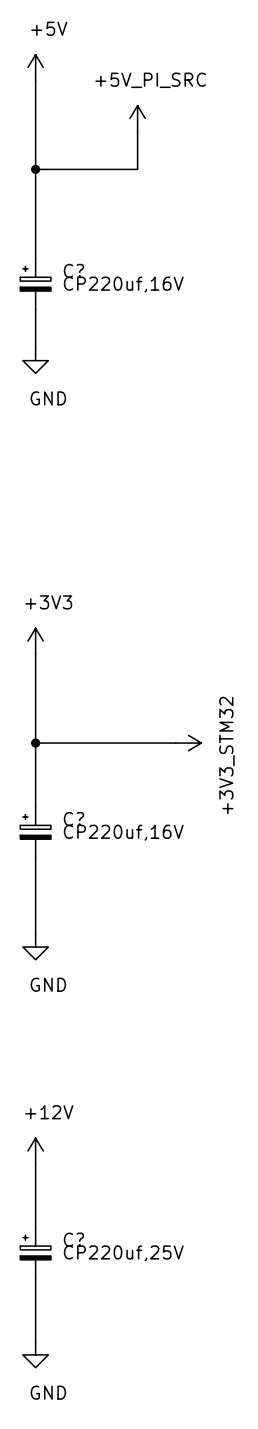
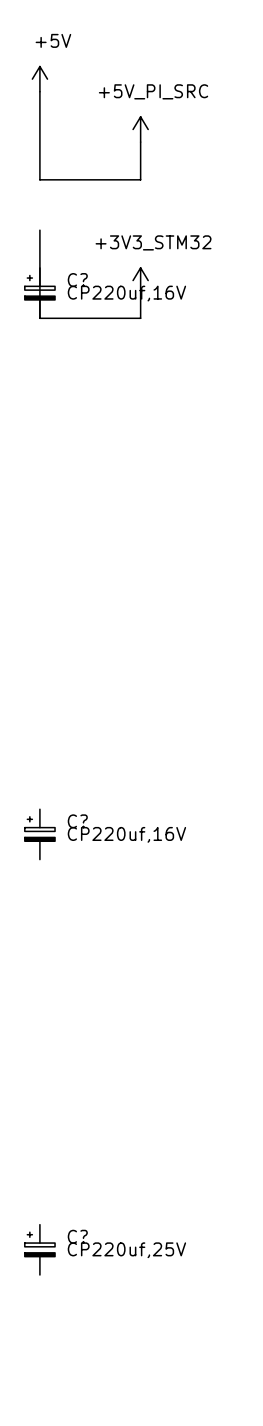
wire: (35, 169) (35, 220) -> none
junction: (35, 169) -> none
wire: none -> (39, 267) (39, 318) (140, 318) (140, 293)
power symbol: none -> +3V3_STM32 (140, 280)
wire: (35, 309) (35, 347) -> none
power symbol: GND (35, 360) -> none
power symbol: +3V3 (35, 641) -> none
wire: (35, 653) (35, 806) -> none
wire: (35, 743) (175, 743) -> none
junction: (35, 743) -> none
power symbol: +3V3_STM32 (188, 743) -> none
wire: (35, 857) (35, 934) -> none
power symbol: GND (35, 947) -> none
power symbol: +12V (35, 1150) -> none
wire: (35, 1163) (35, 1227) -> none
wire: (35, 1278) (35, 1342) -> none
power symbol: GND (35, 1354) -> none

